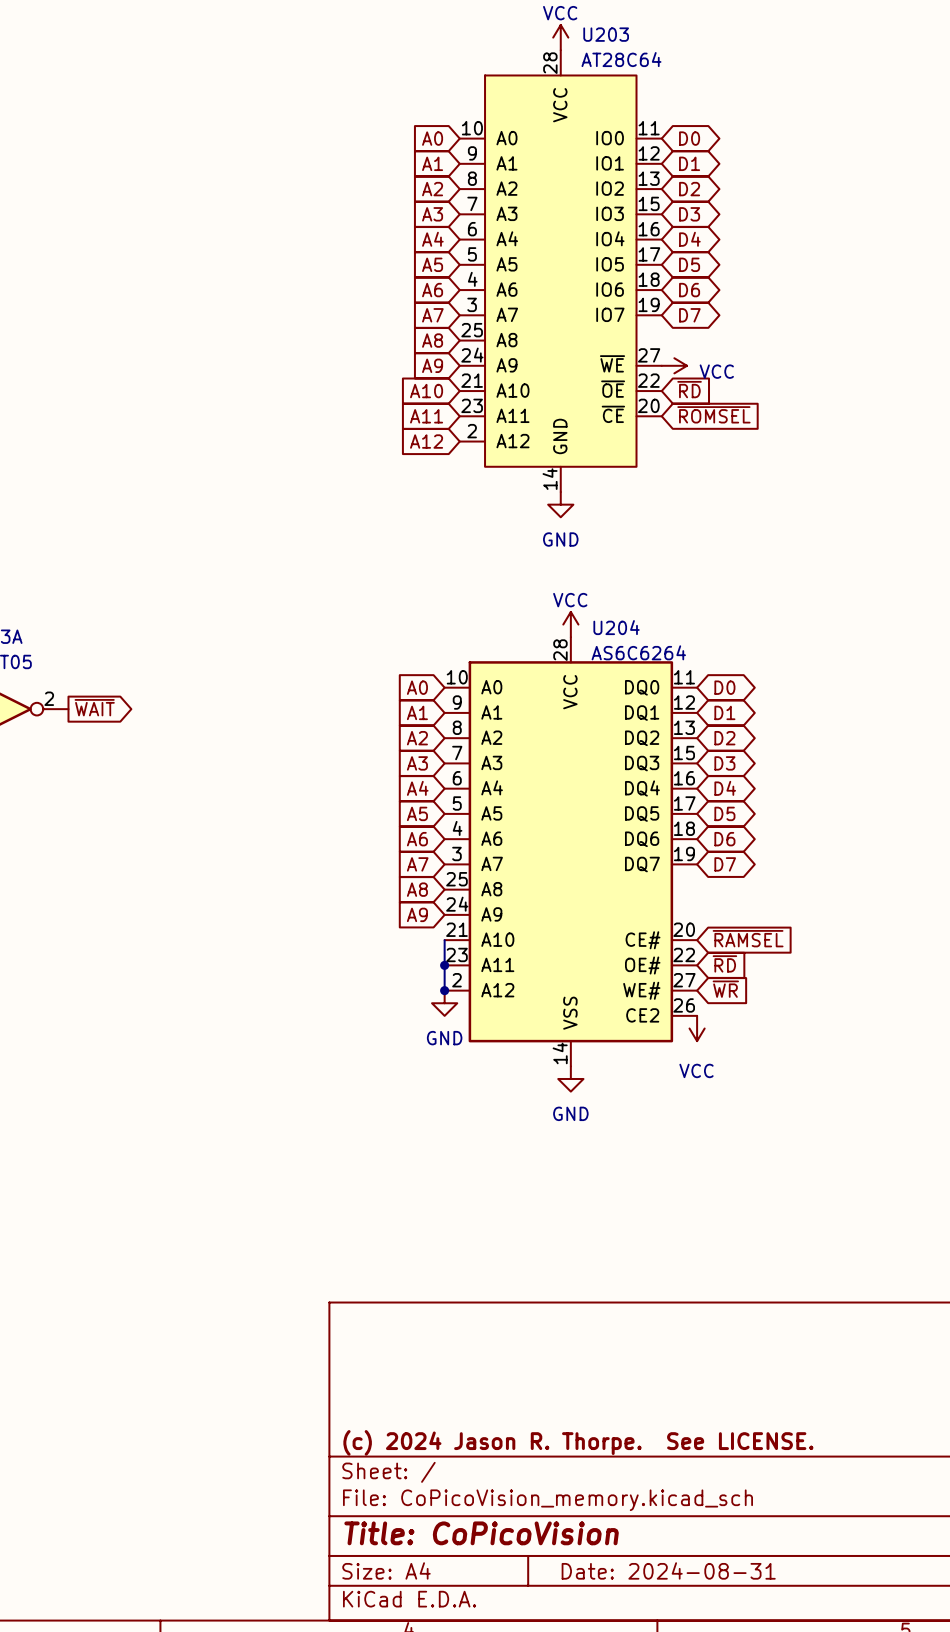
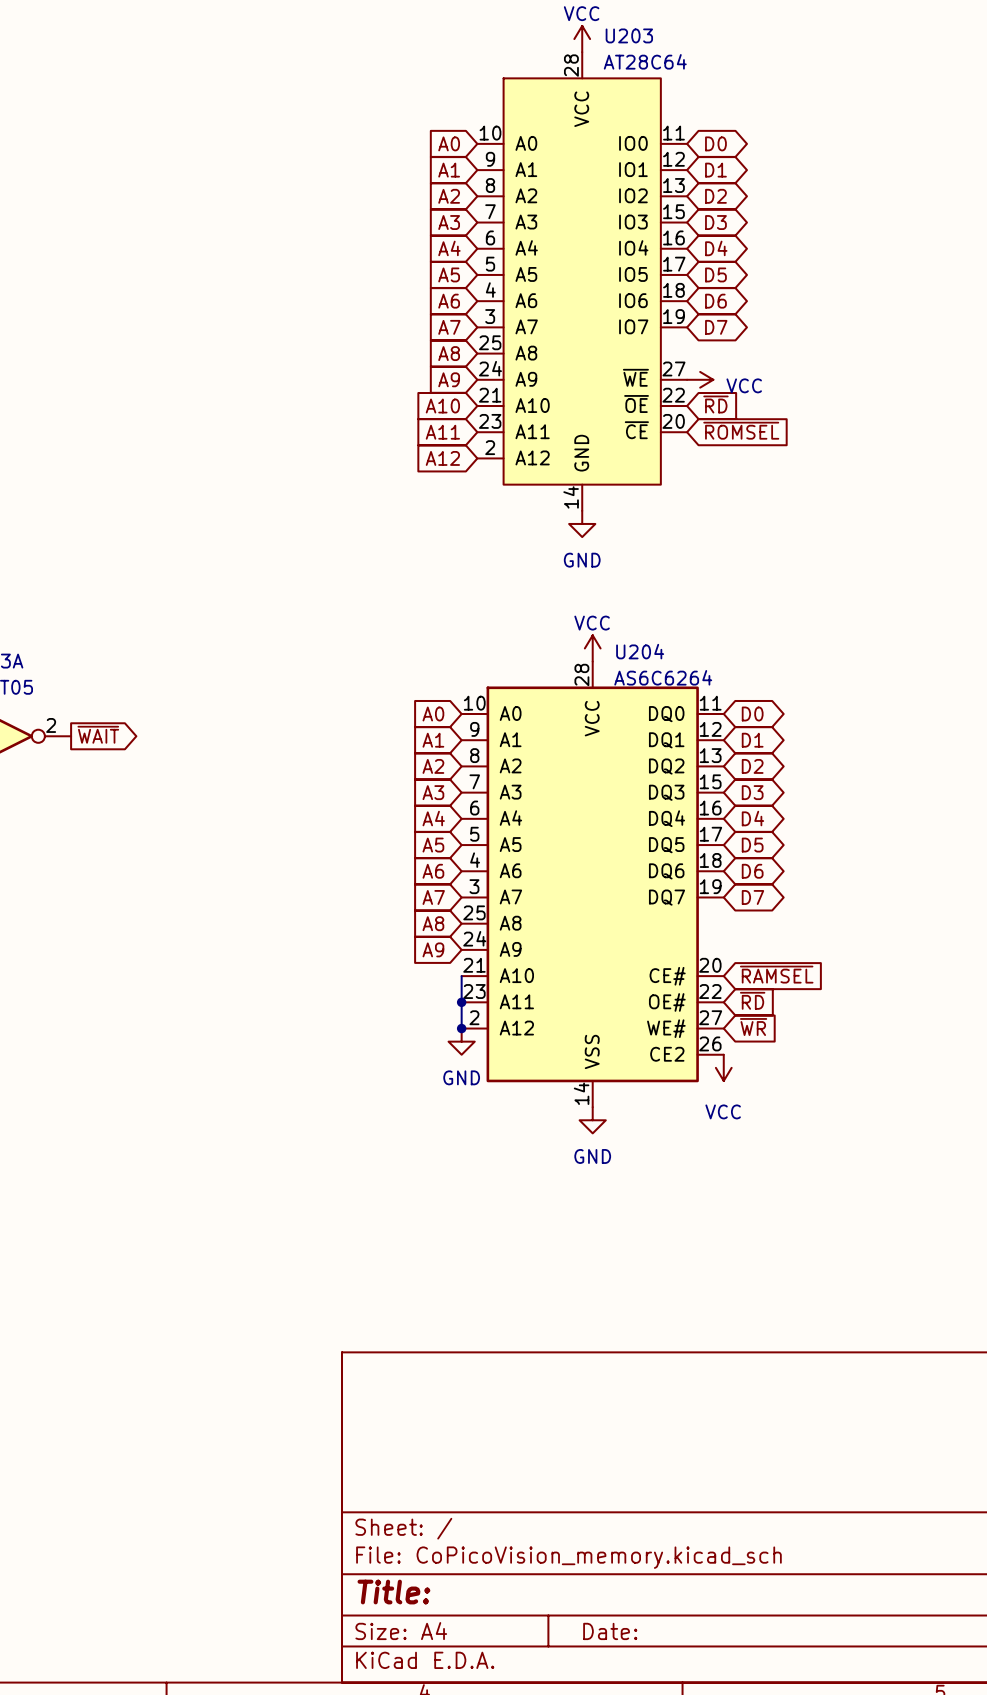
title block: (c) 2024 Jason R. Thorpe. See LICENSE. (578, 1442) -> none
title block: Title: CoPicoVision (481, 1533) -> Title: (393, 1592)
title block: Date: 2024-08-31 (668, 1570) -> Date: (610, 1631)

